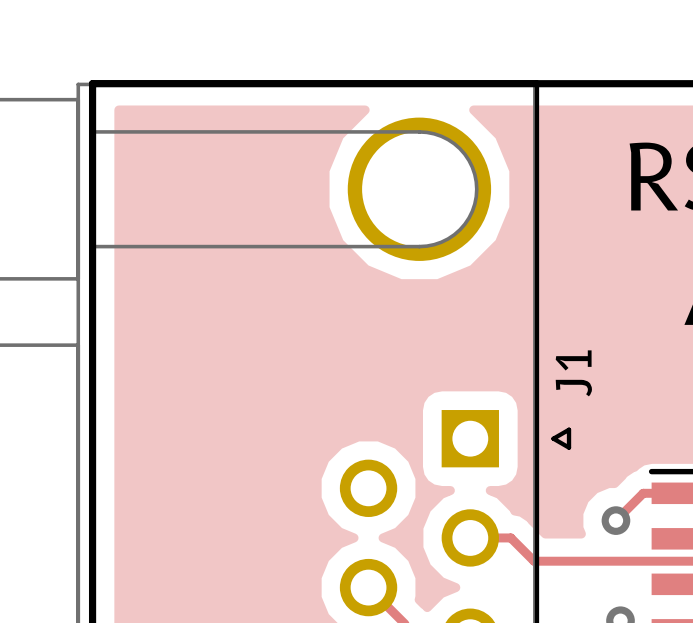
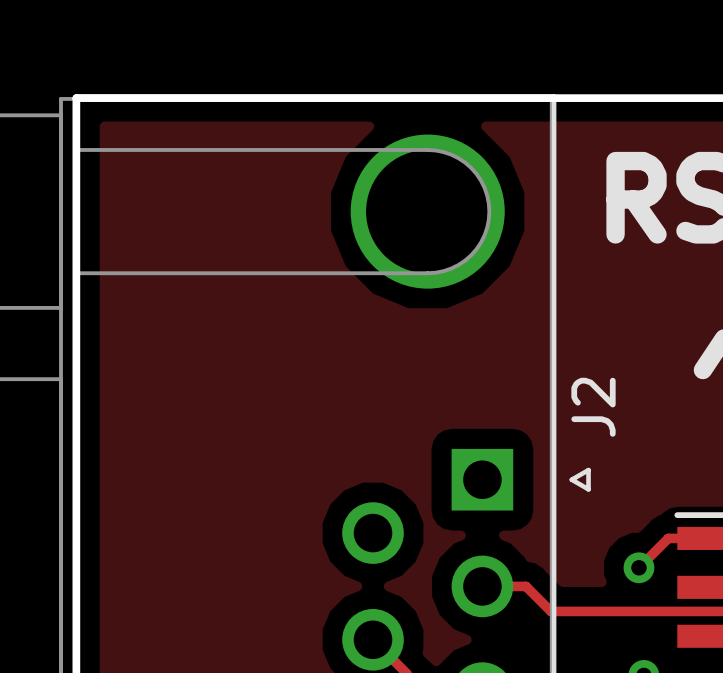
J1 name: J1 (573, 373) -> J2 (593, 407)

